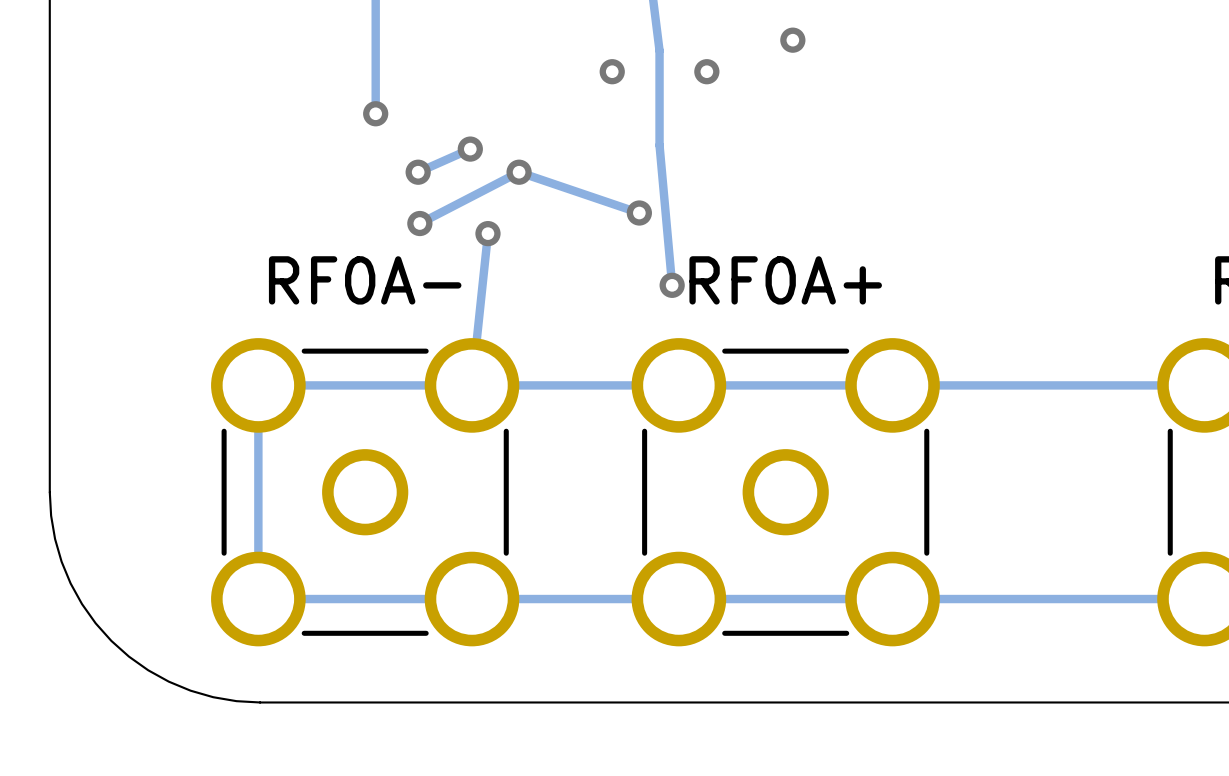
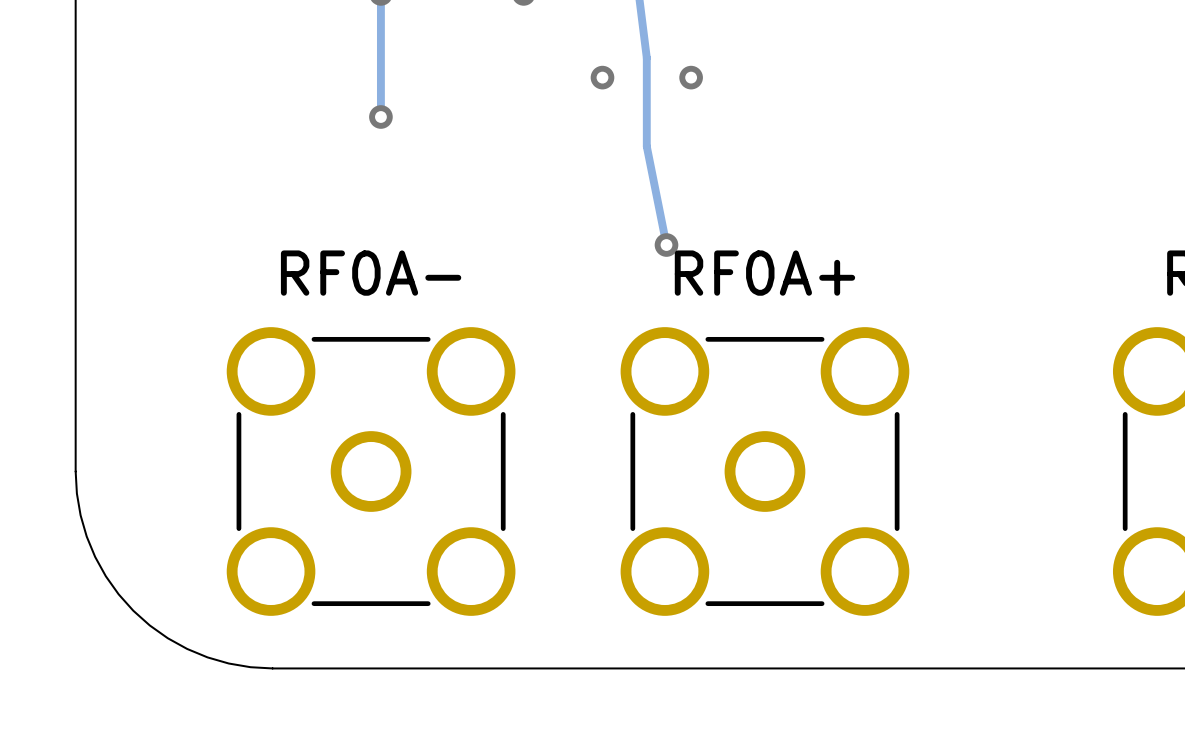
via: (792, 40) -> none
track: (659, 145) (672, 285) -> (646, 146) (666, 245)
track: (470, 149) (418, 172) -> none
via: (470, 149) -> none
via: (418, 172) -> none
via: (519, 172) -> none
track: (639, 213) (519, 172) (419, 223) -> none
via: (639, 213) -> none
via: (419, 223) -> none
track: (487, 233) (471, 385) -> none
via: (487, 233) -> none
via: none -> (666, 245)
via: (672, 285) -> none
track: (1204, 385) (258, 385) (258, 599) (1204, 599) -> none

